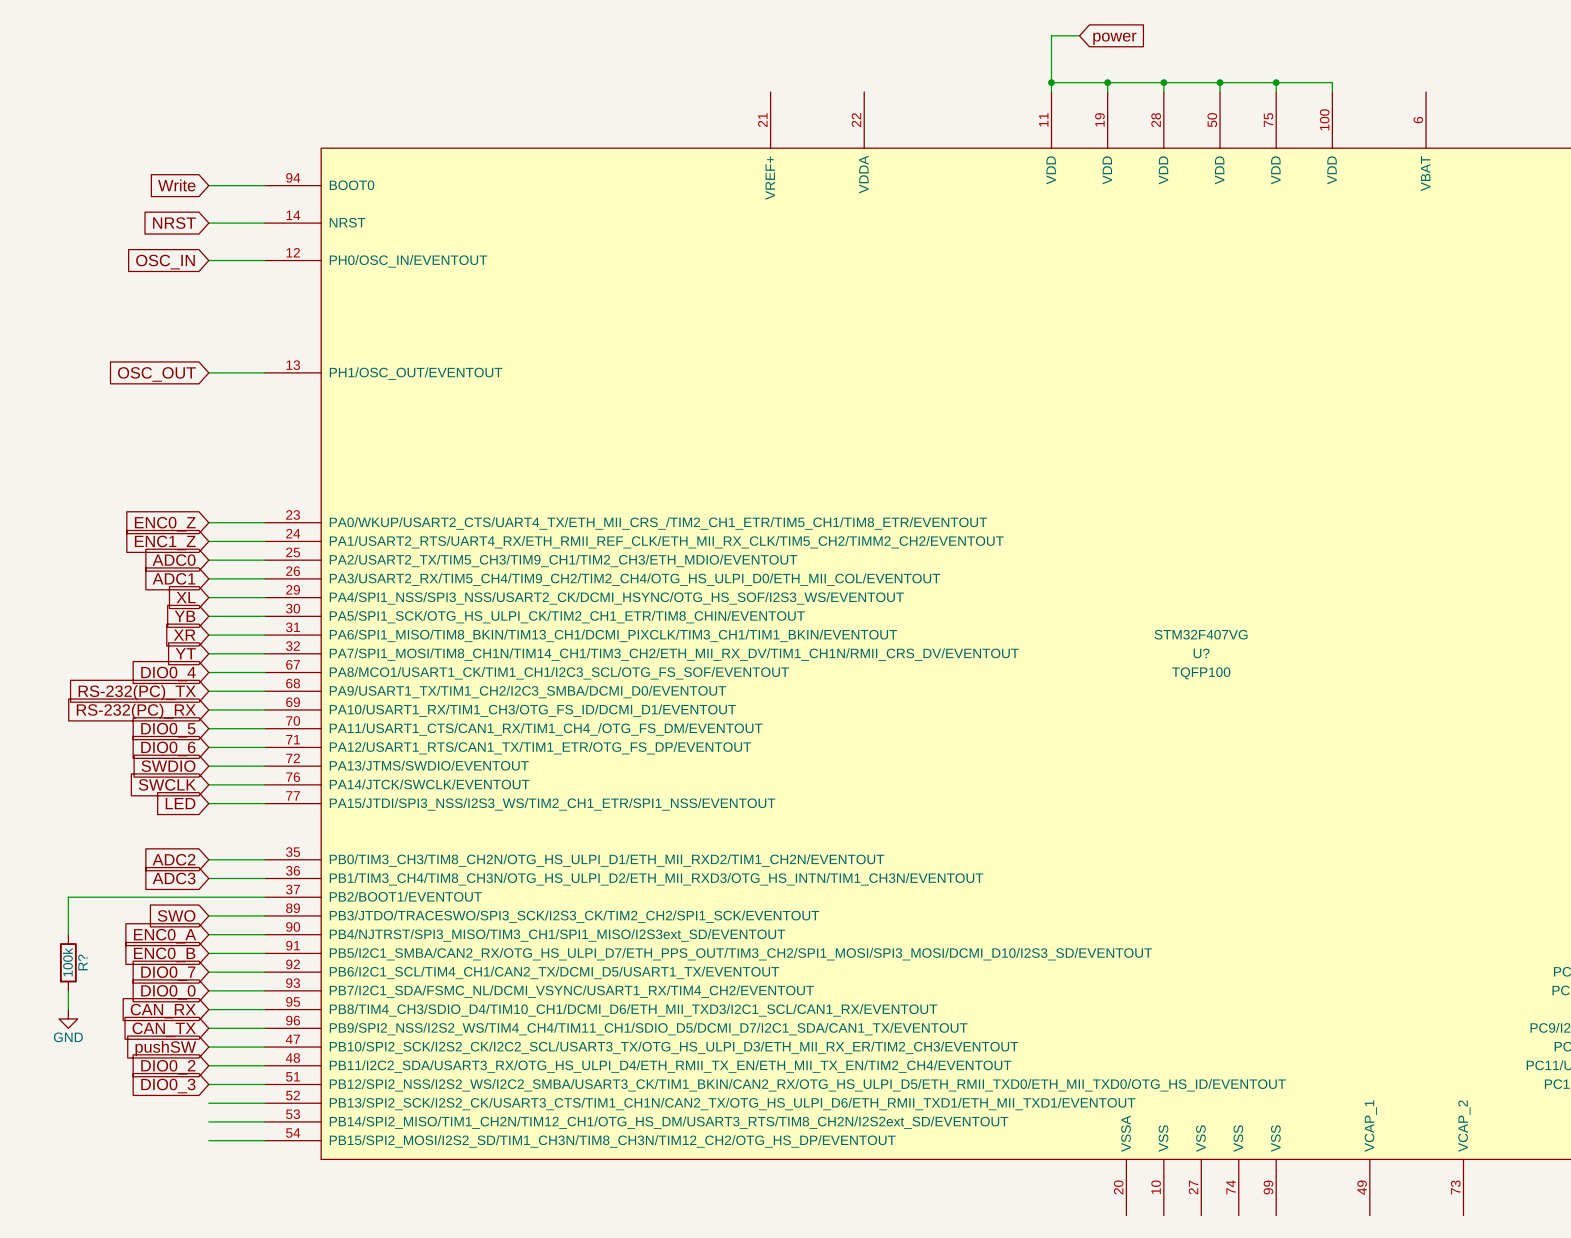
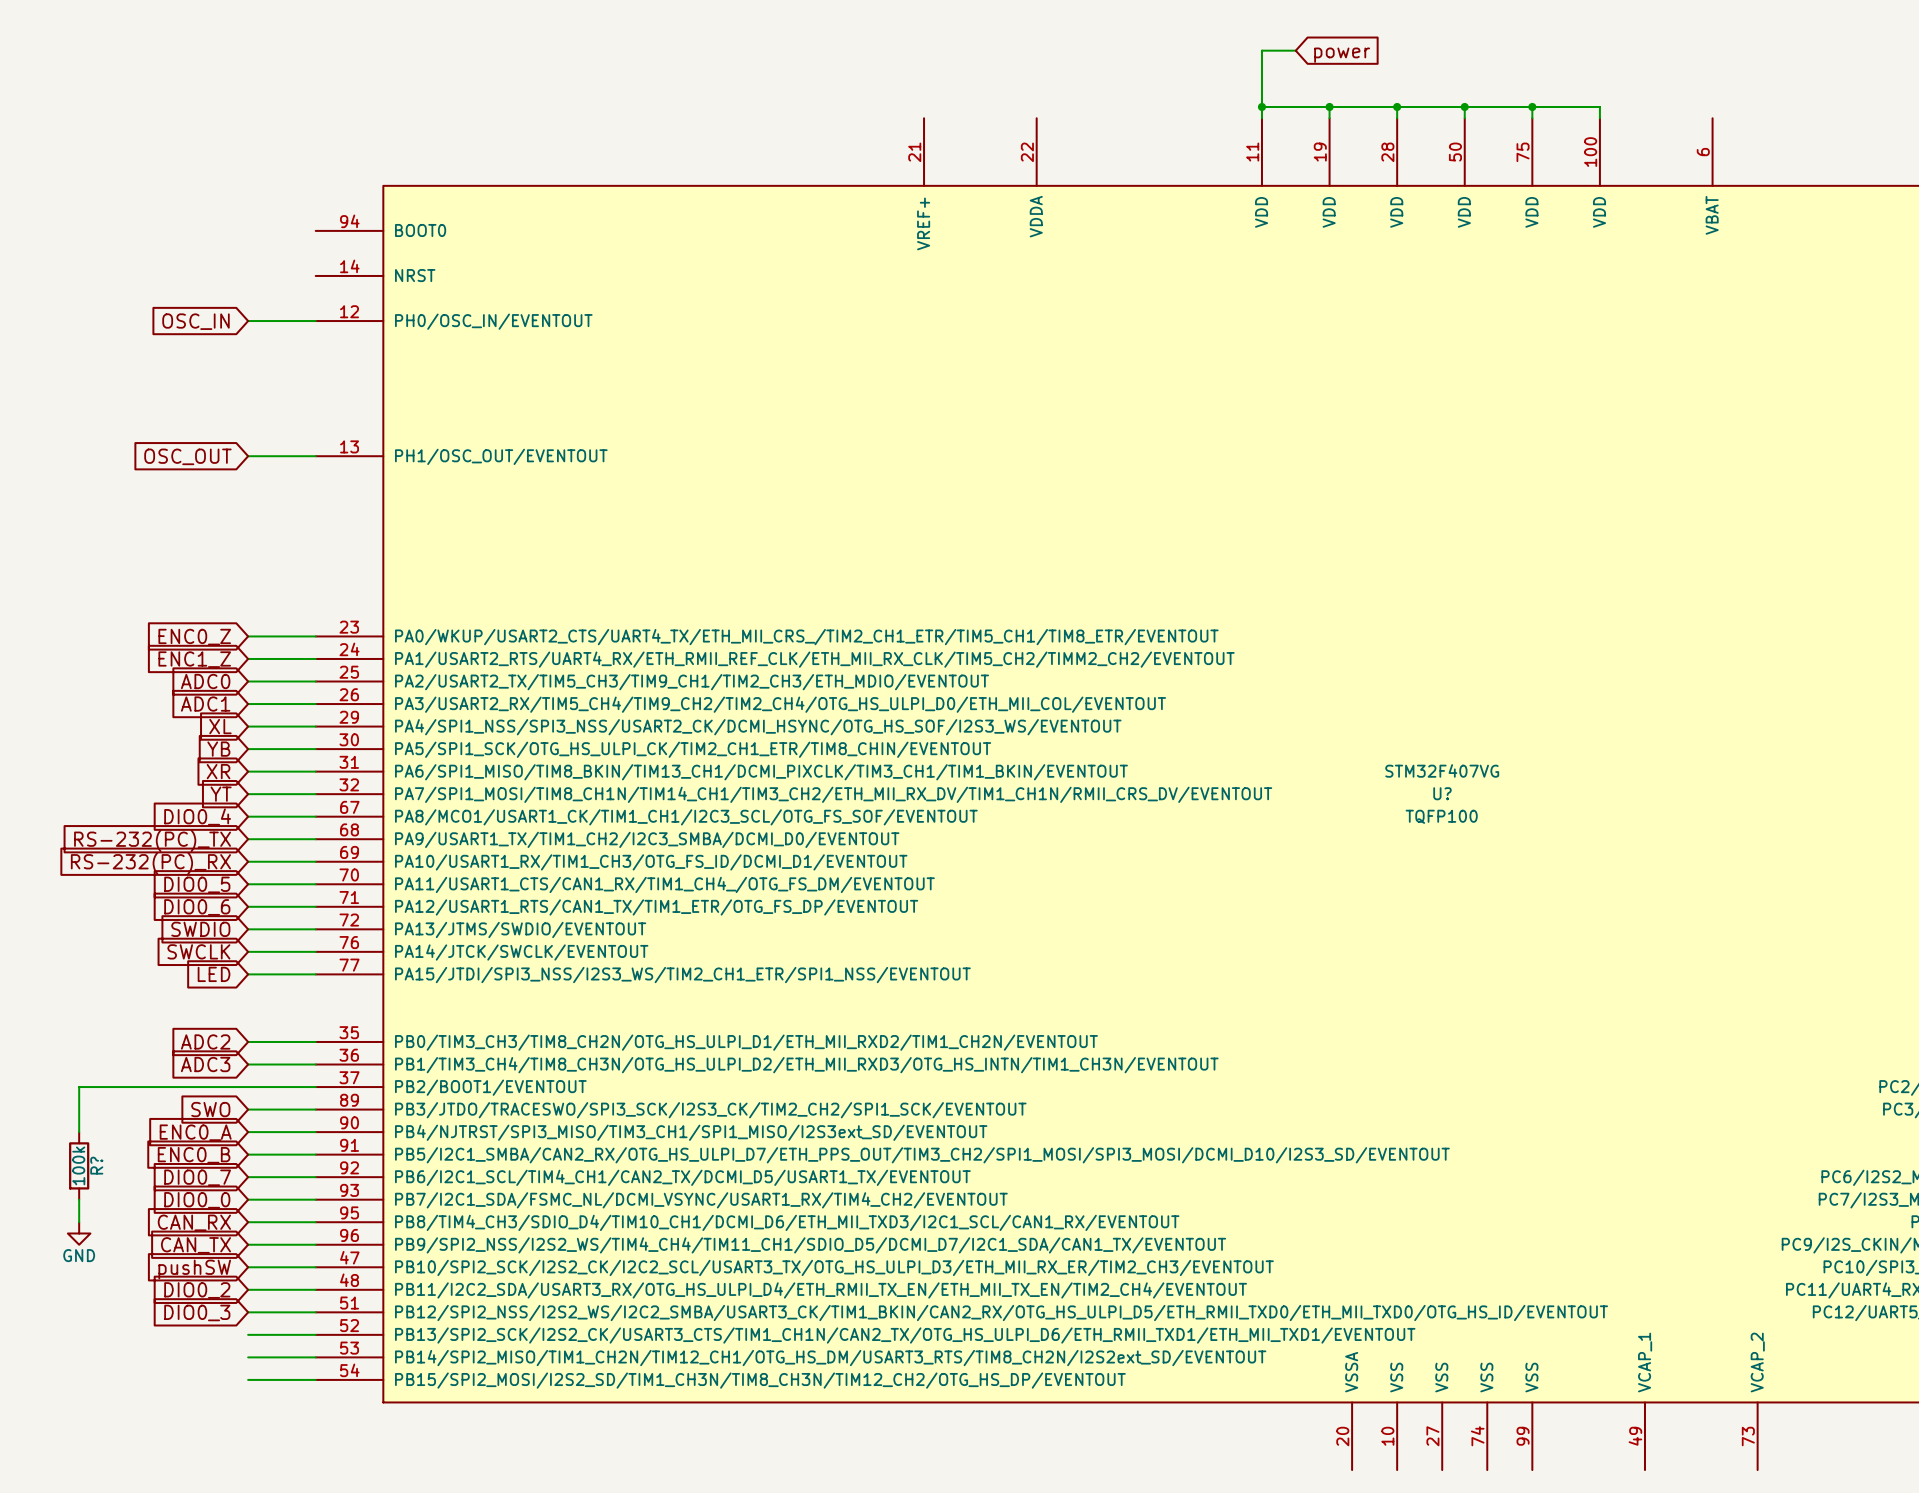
global label: Write (176, 185) -> none
wire: (208, 185) (264, 185) -> none
global label: NRST (174, 223) -> none
wire: (208, 223) (264, 223) -> none

